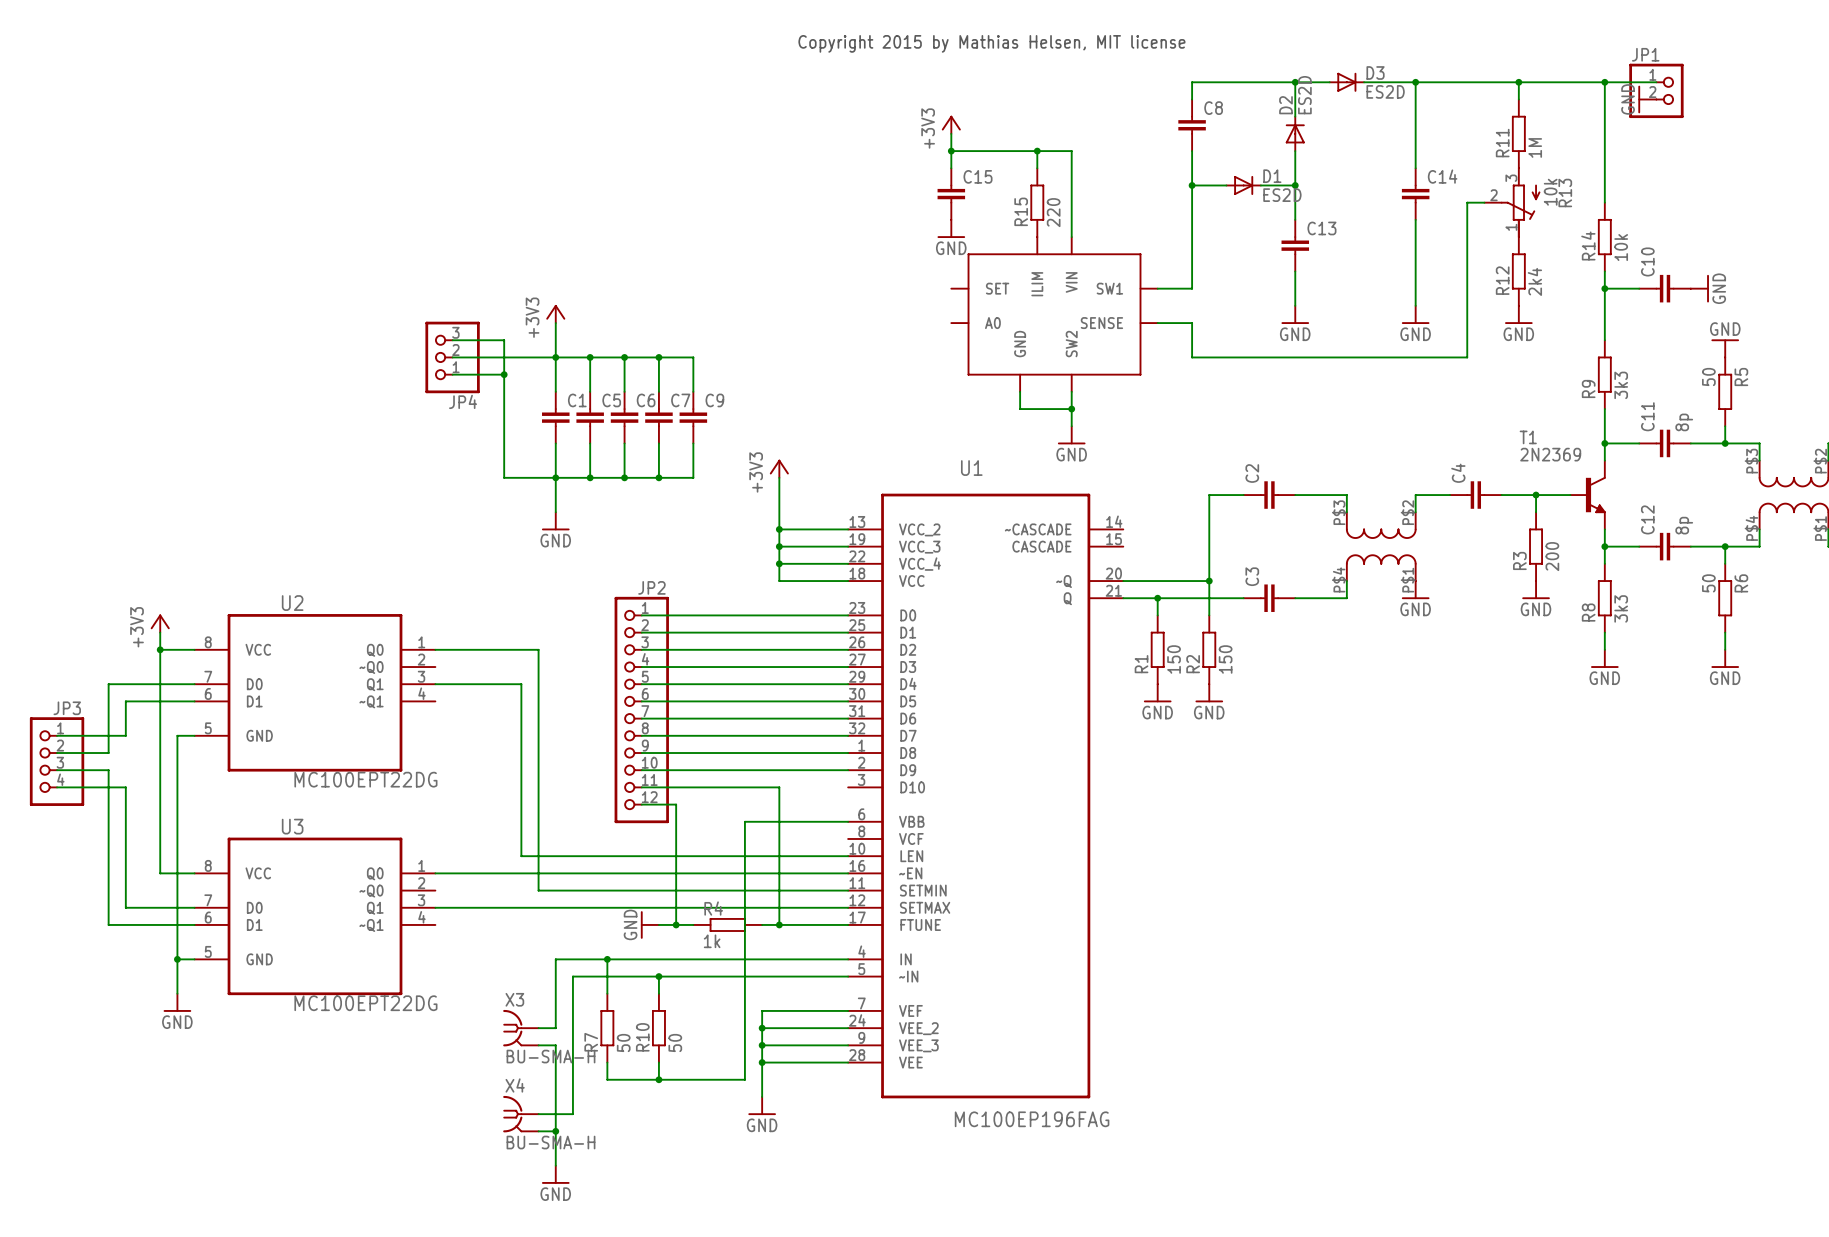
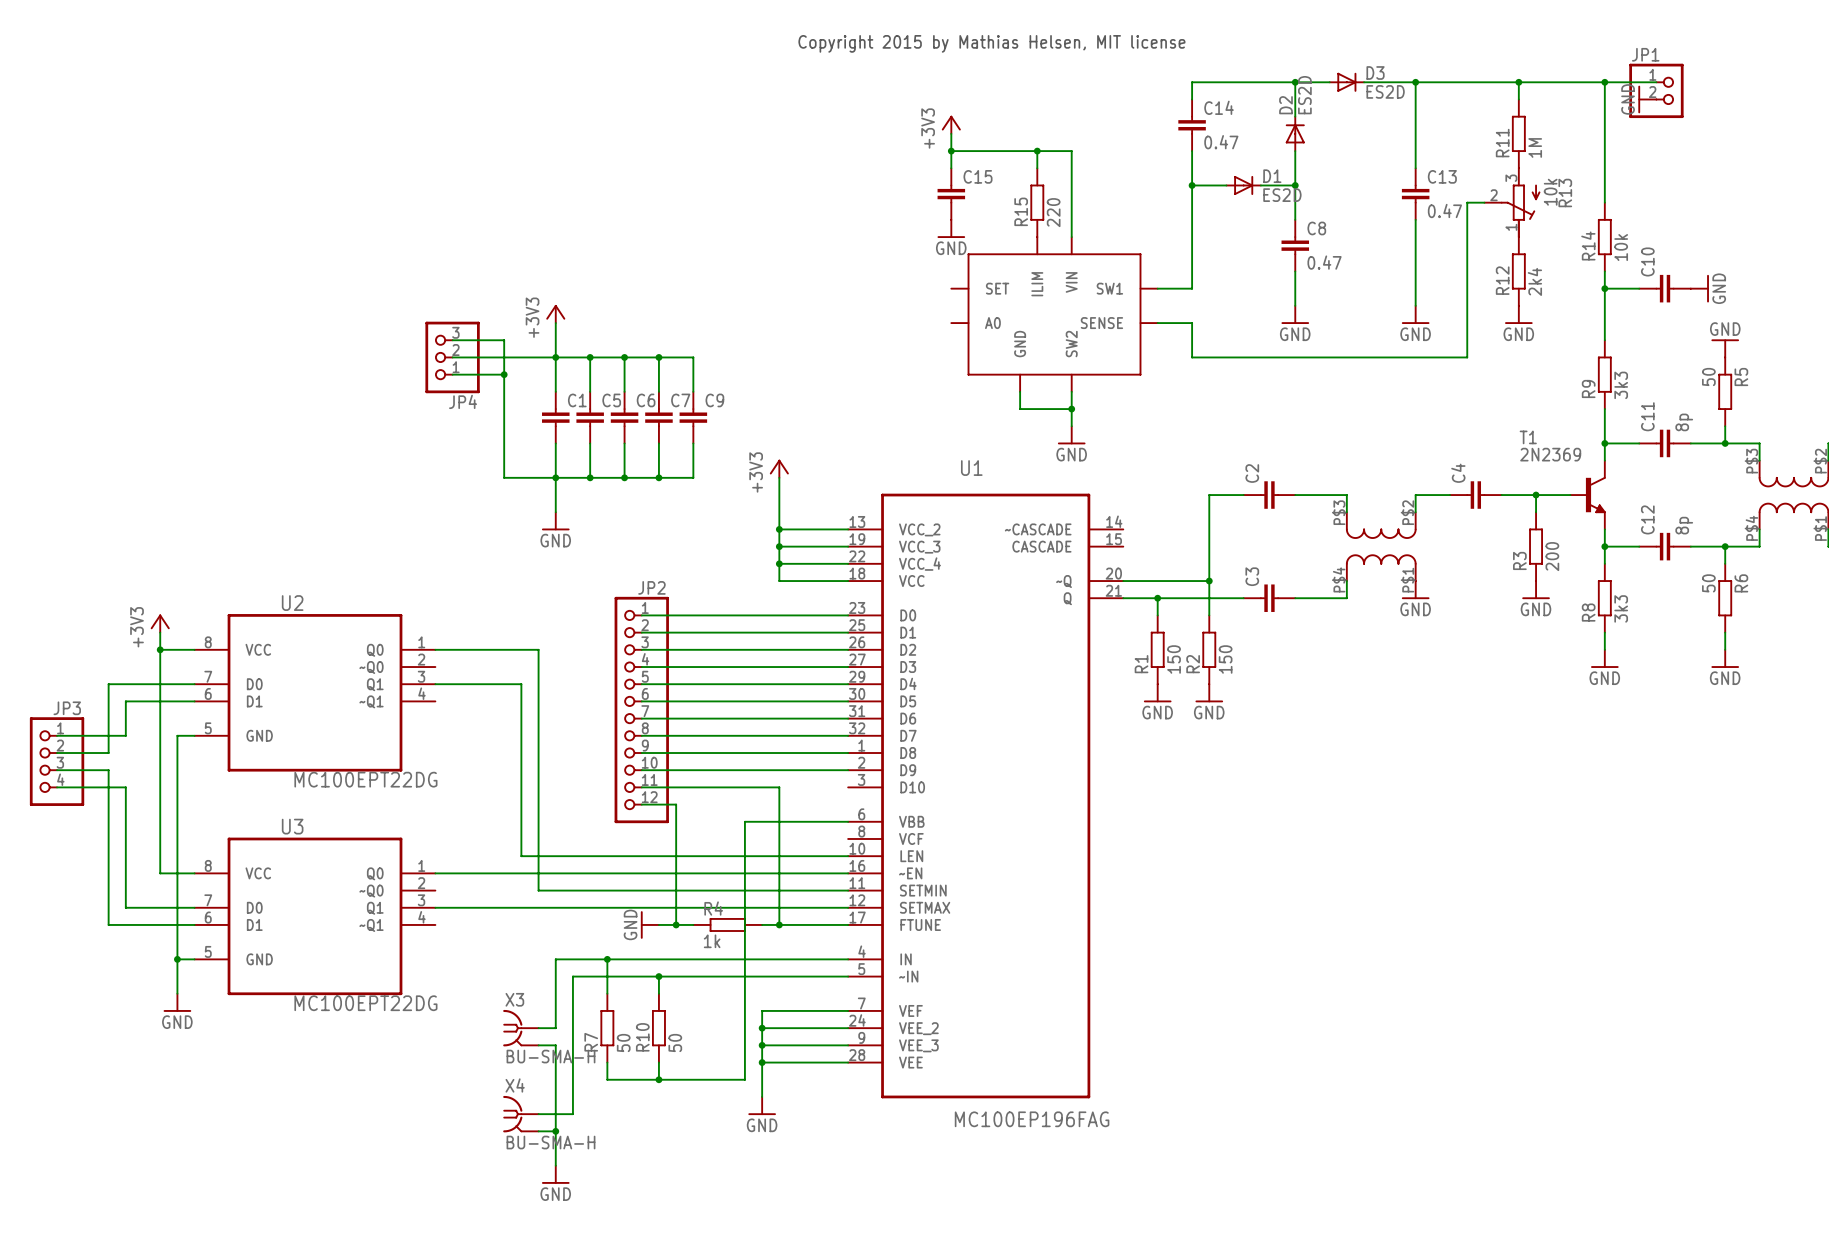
C8 name: C8 (1213, 108) -> C14 (1219, 107)
C8 value: none -> 0.47 (1221, 142)
C14 name: C14 (1442, 176) -> C13 (1442, 176)
C14 value: none -> 0.47 (1444, 210)
C13 name: C13 (1321, 228) -> C8 (1316, 228)
C13 value: none -> 0.47 (1324, 262)

